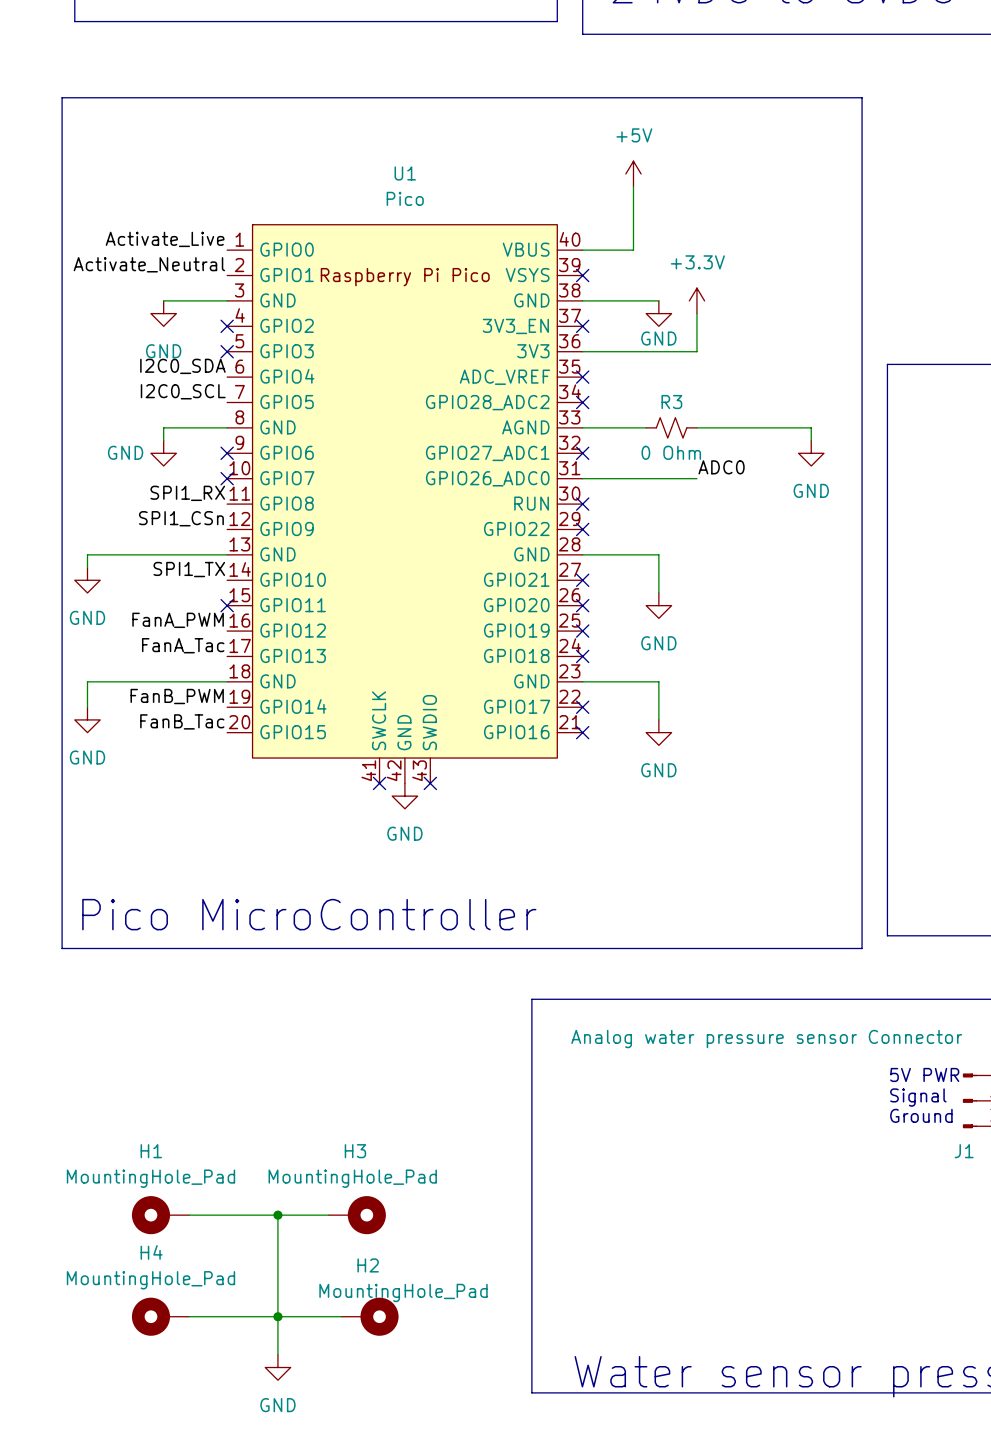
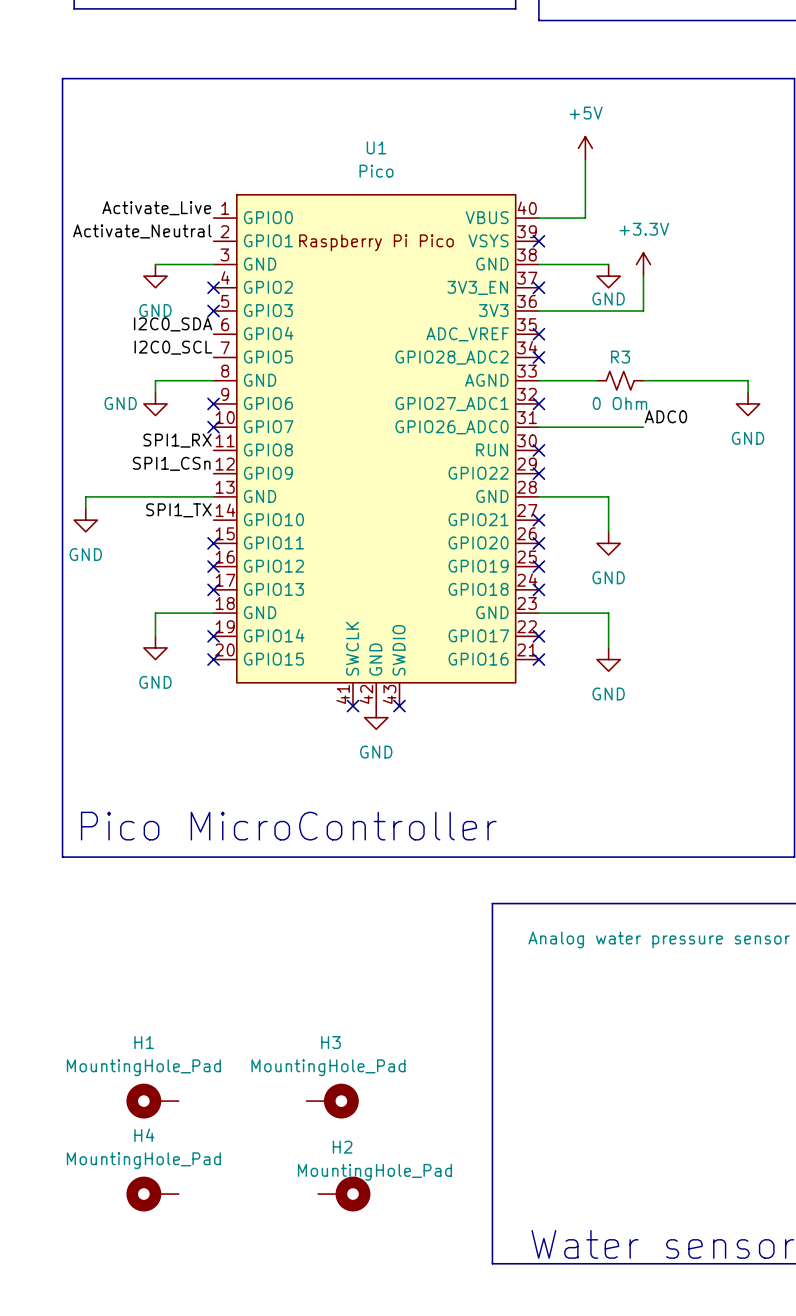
label: FanA_PWM (178, 620) -> none
no-connect mark: none -> (213, 566)
label: FanA_Tac (183, 645) -> none
no-connect mark: none -> (213, 589)
wire: (163, 681) (87, 681) (87, 707) -> (155, 613) (155, 636)
label: FanB_PWM (177, 696) -> none
no-connect mark: none -> (213, 636)
power symbol position: GND (87, 719) -> GND (155, 647)
label: FanB_Tac (182, 721) -> none
no-connect mark: none -> (213, 659)
wire: (189, 1215) (328, 1215) -> none
wire: (277, 1215) (277, 1354) -> none
junction: (277, 1215) -> none
wire: (189, 1316) (341, 1316) -> none
junction: (277, 1316) -> none
power symbol: GND (277, 1367) -> none

